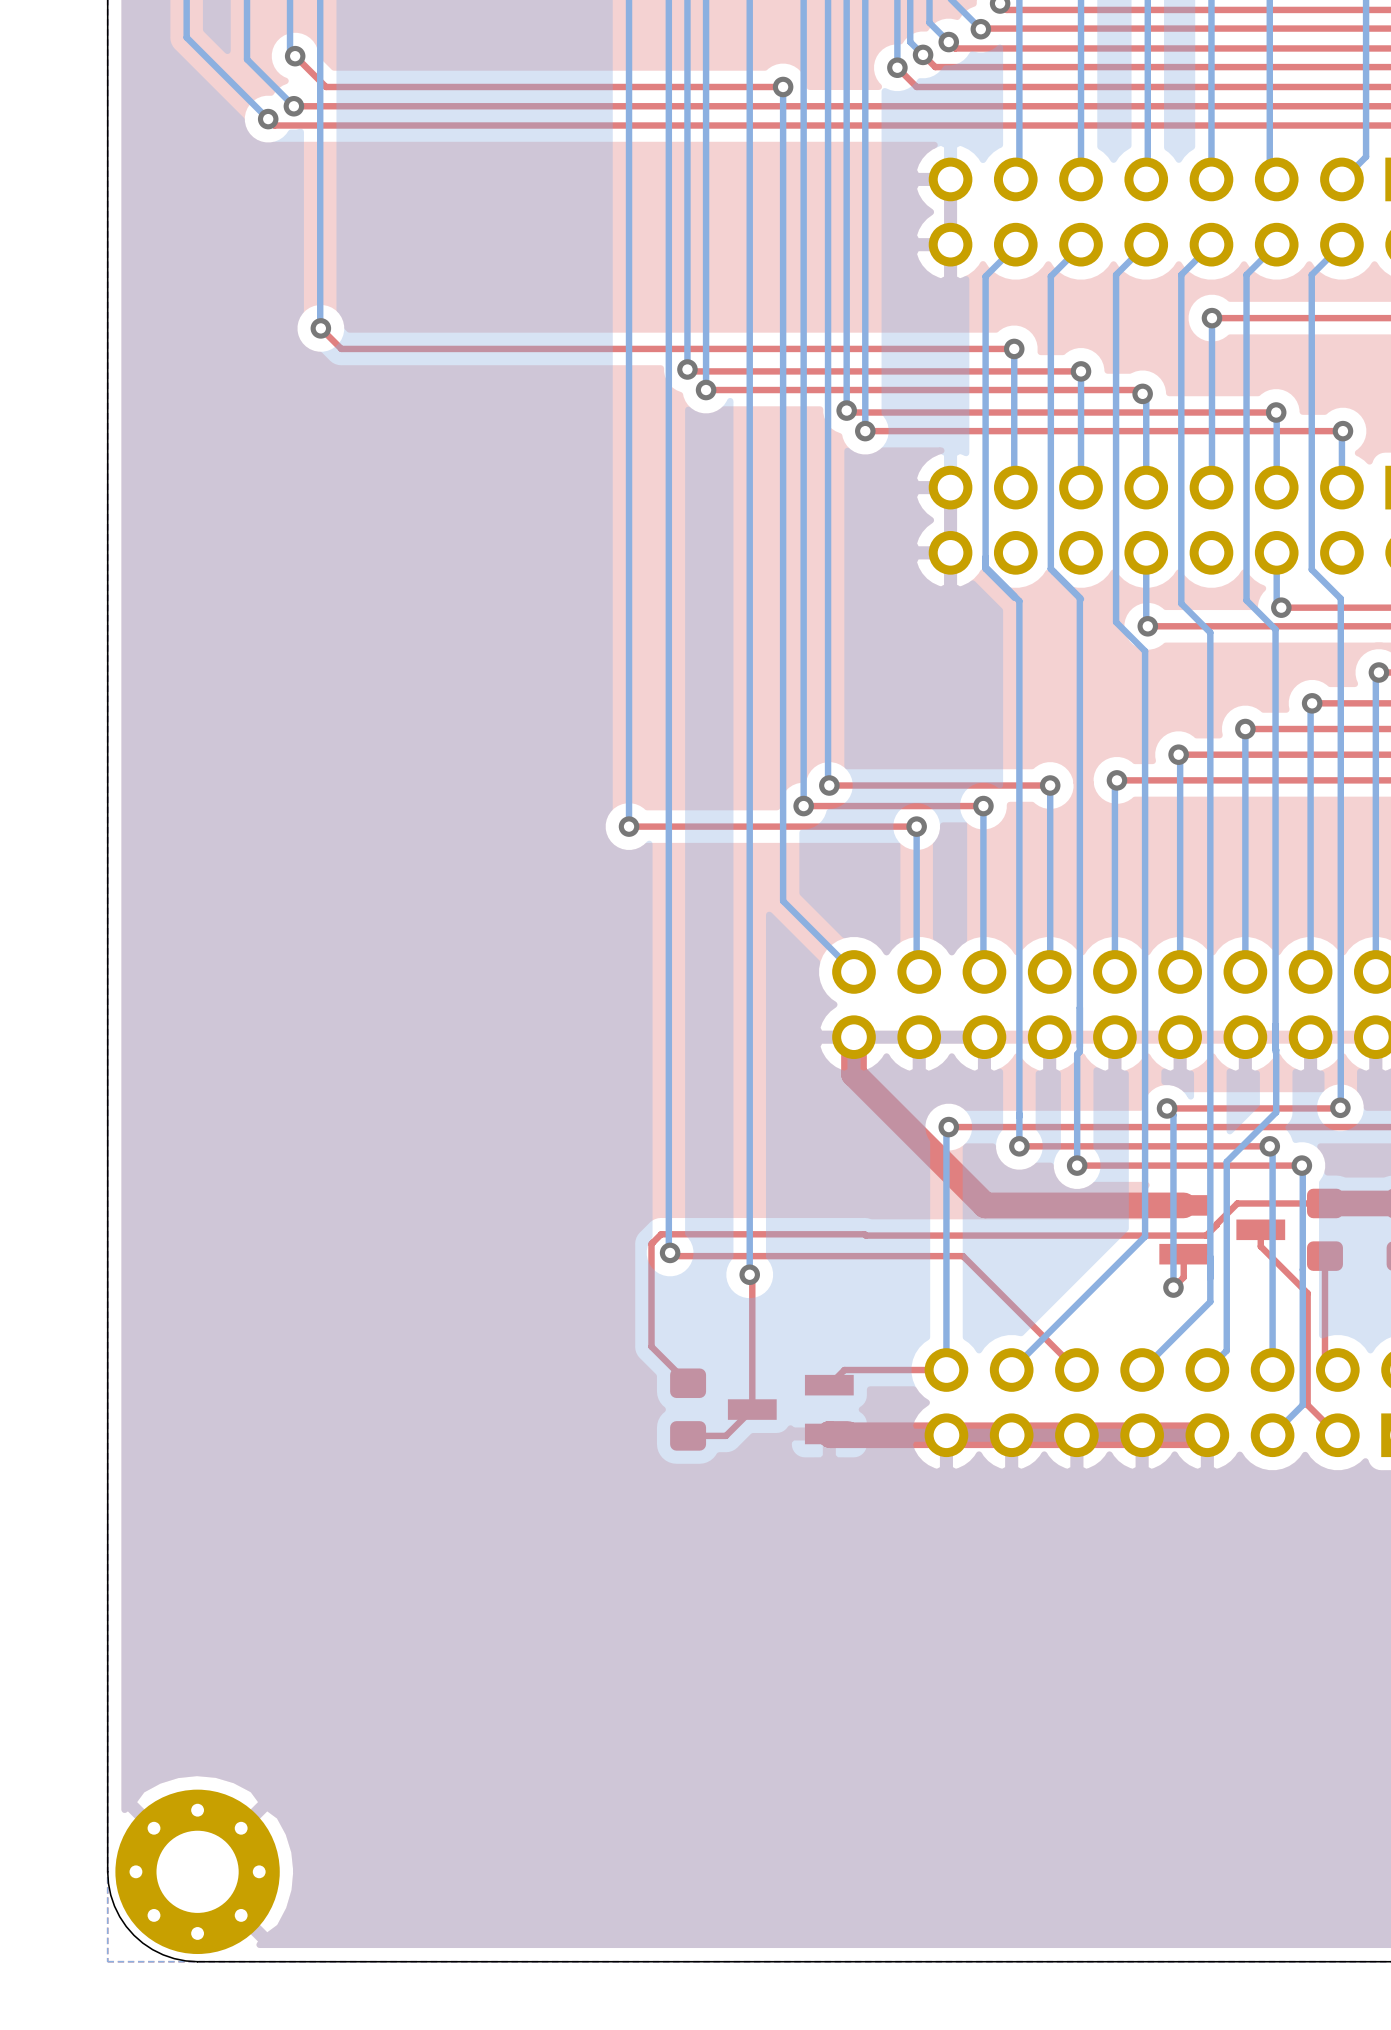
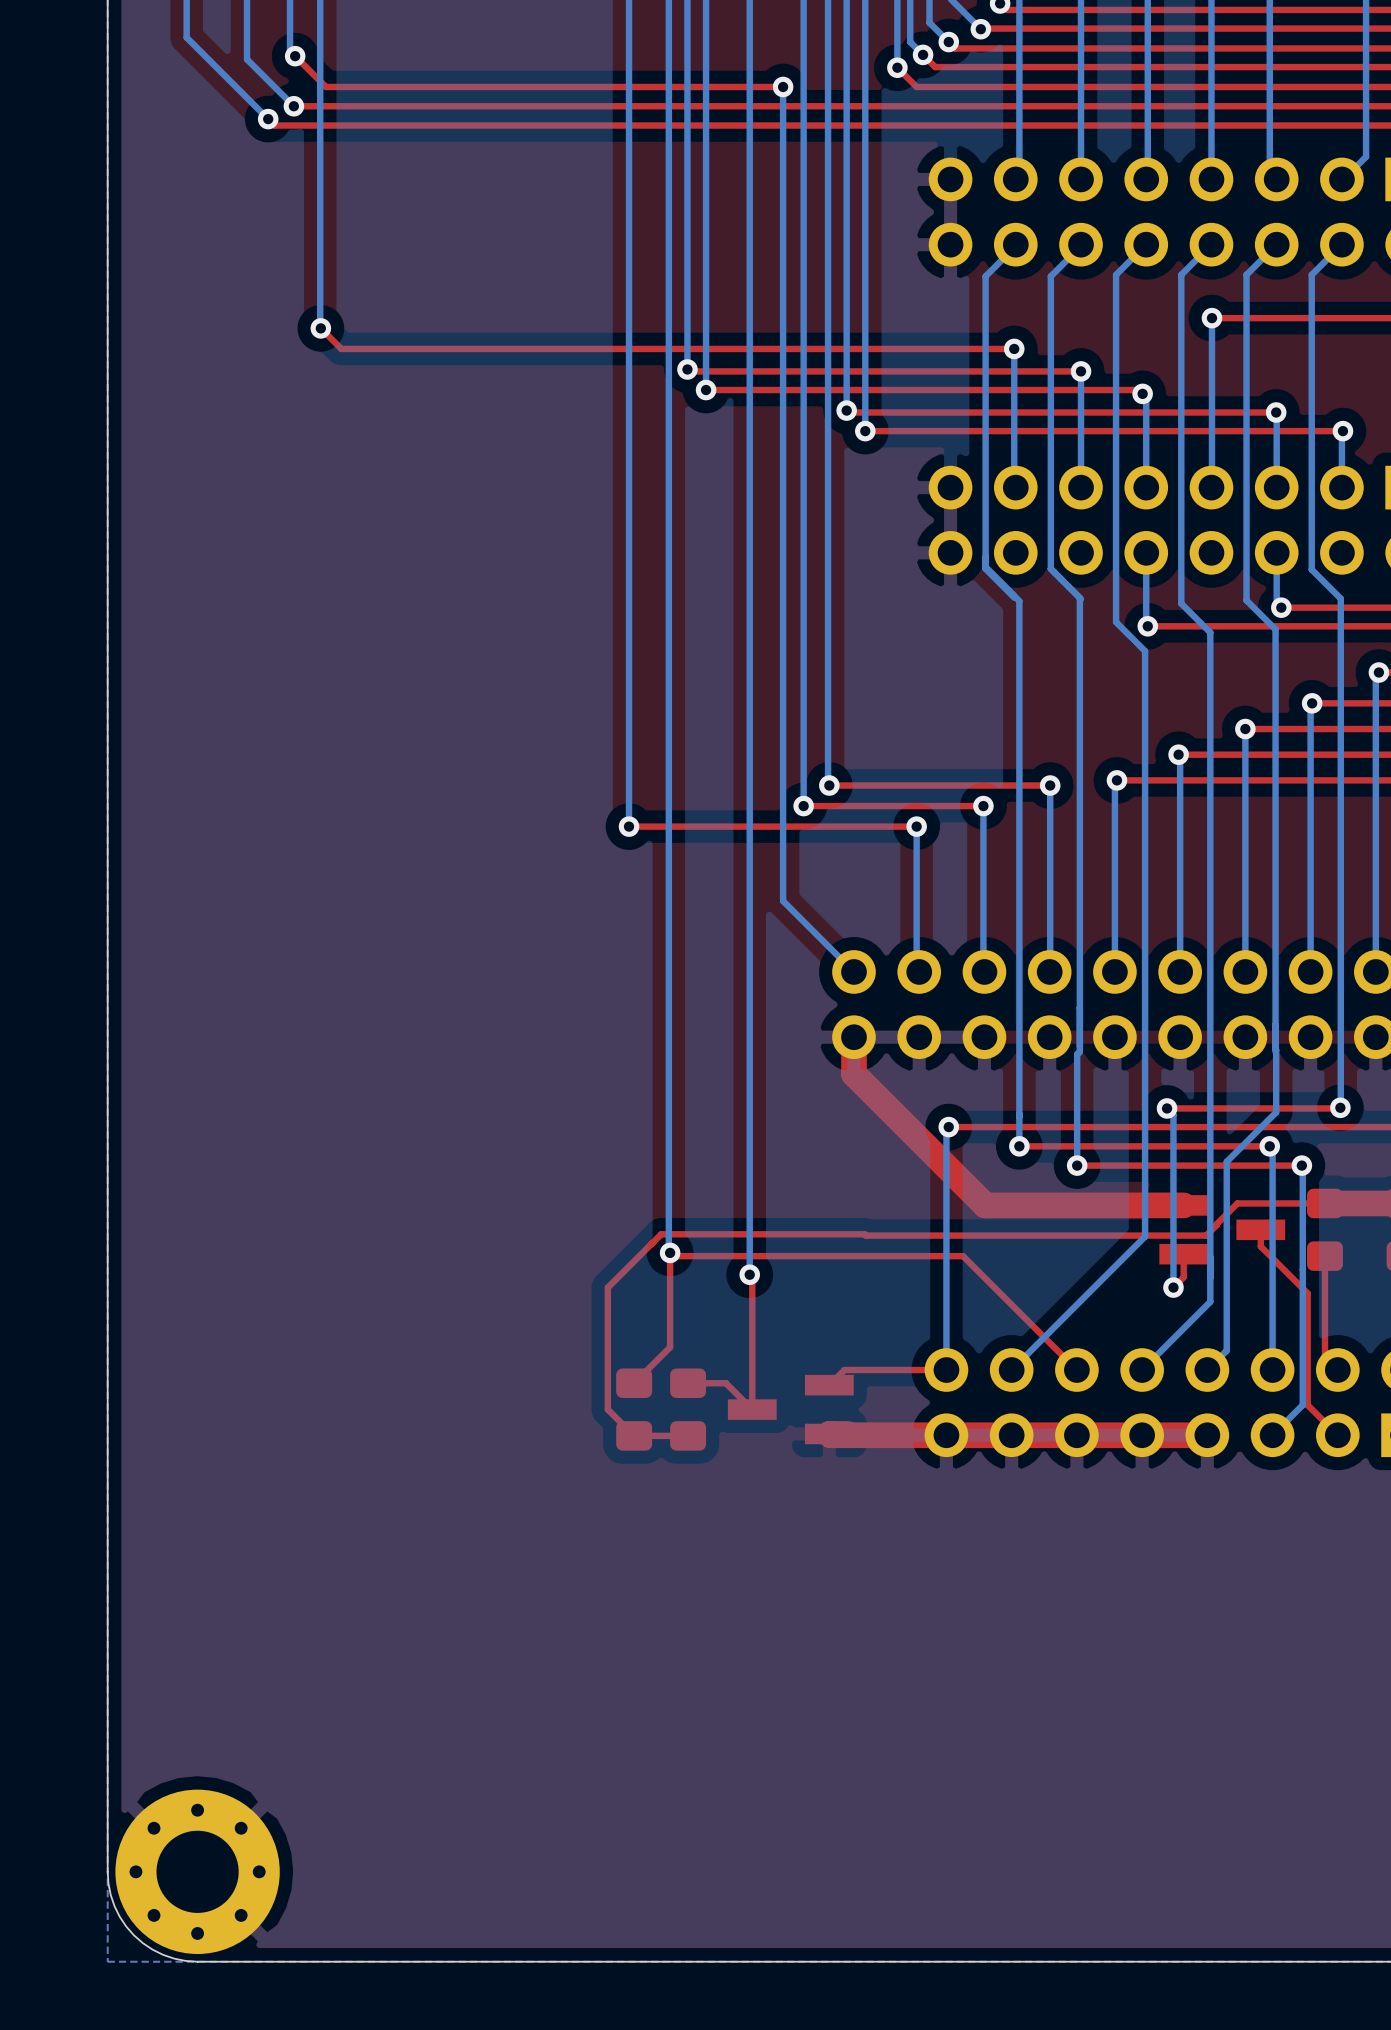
top track: (651, 1243) (651, 1346) (688, 1383) -> (651, 1243) (607, 1287) (607, 1409) (634, 1435) (688, 1435)
top track: none -> (670, 1252) (670, 1347) (634, 1383)
part: none -> (634, 1409)
top track: (752, 1409) (725, 1435) (688, 1435) -> (752, 1409) (725, 1383) (686, 1383)

